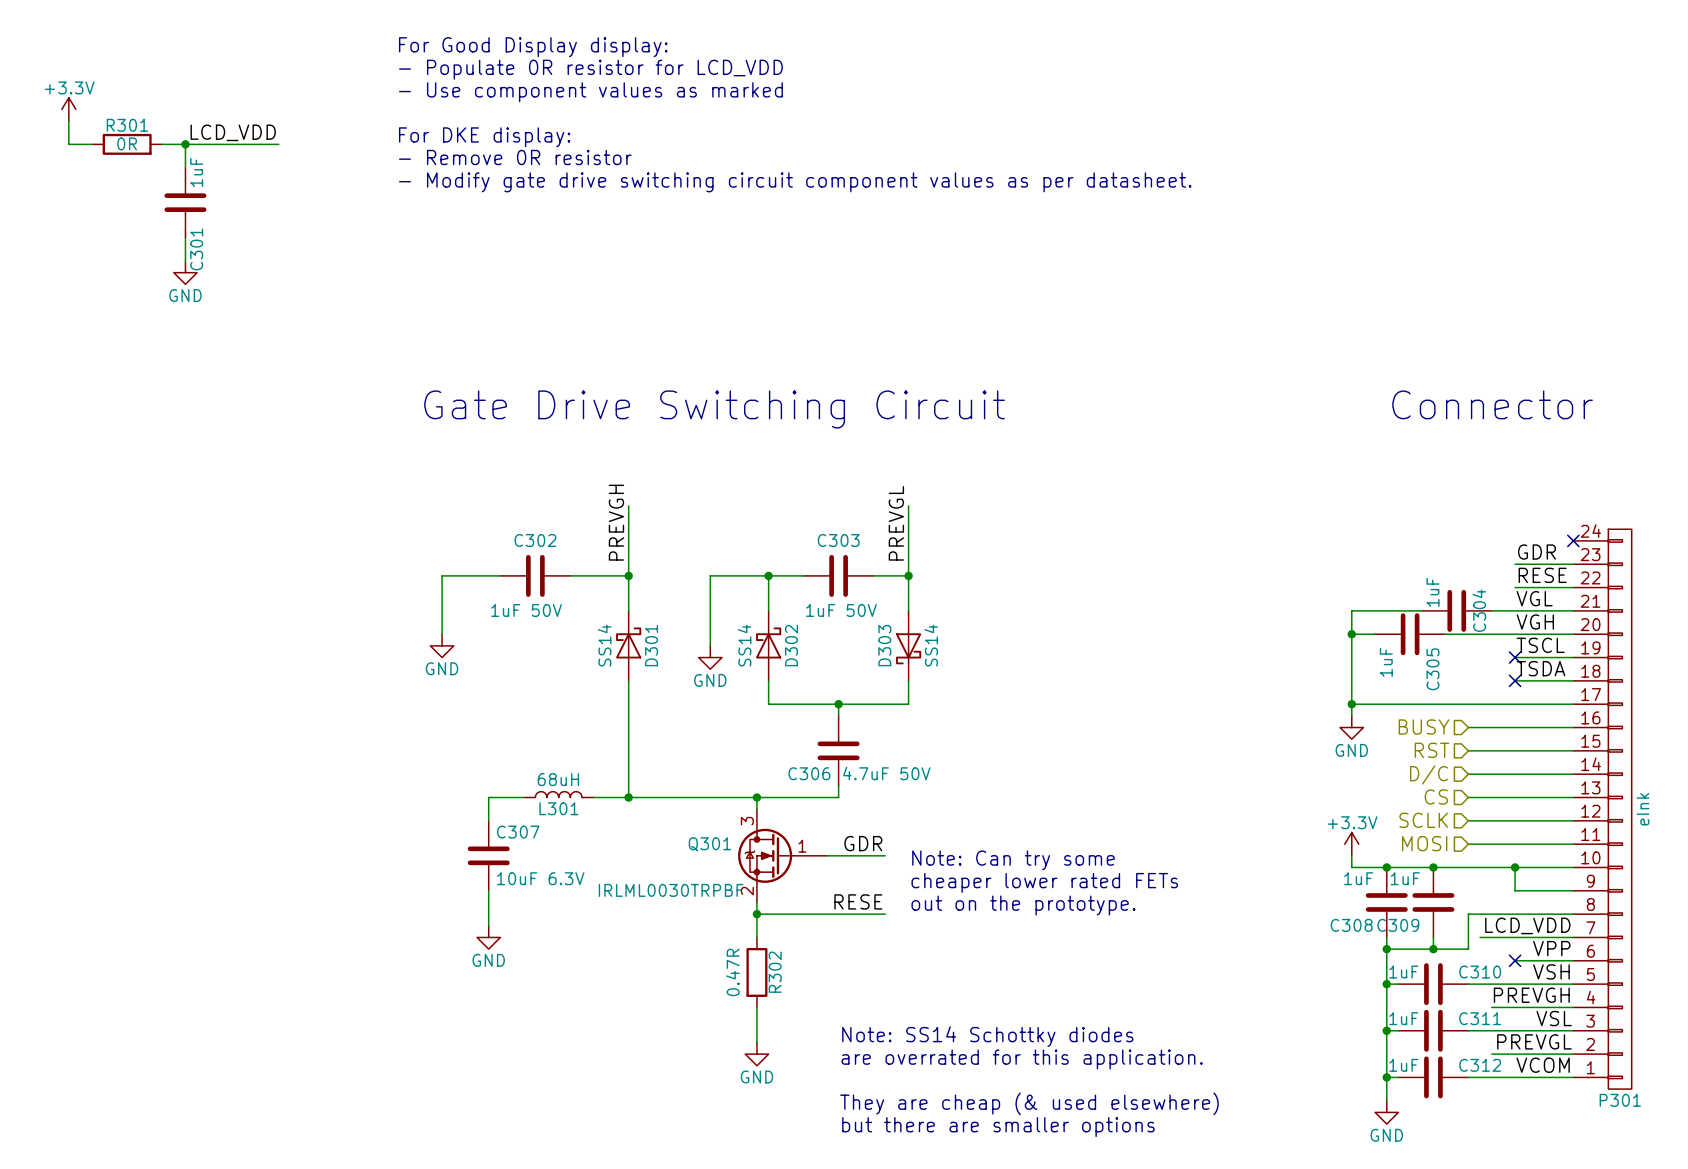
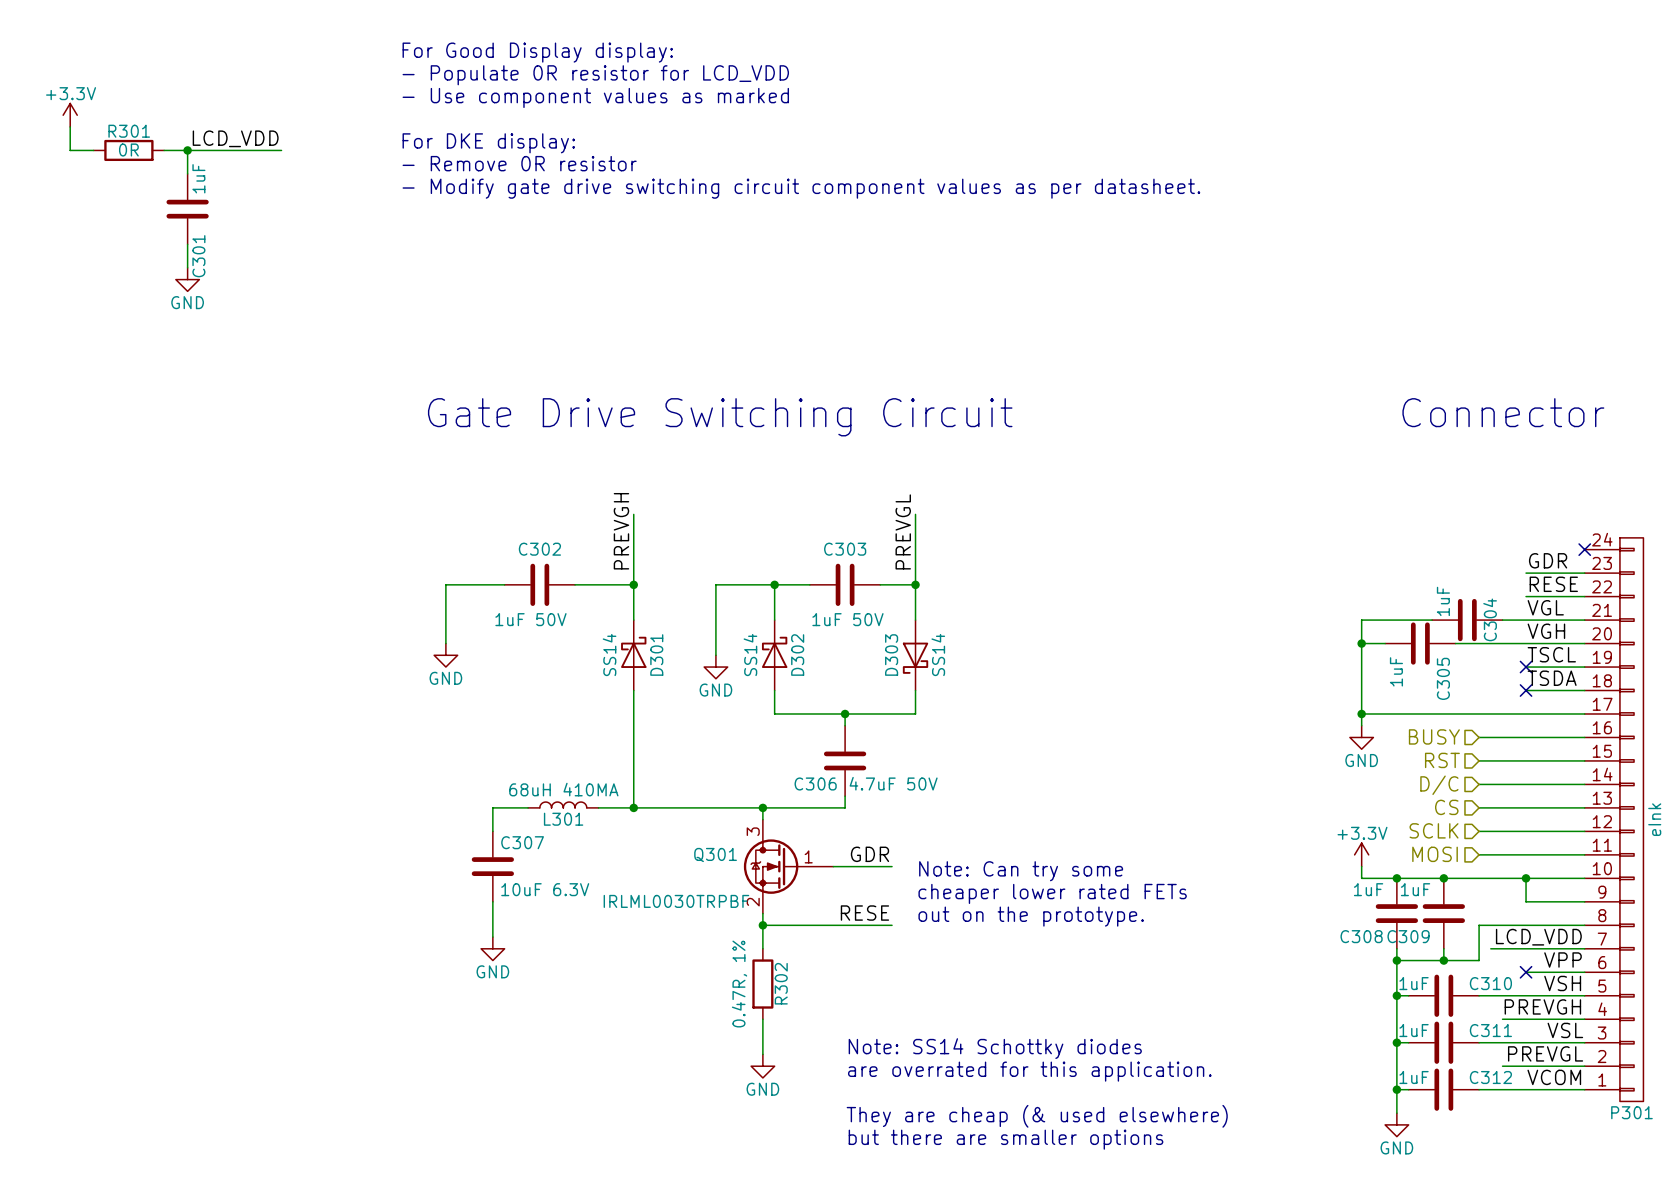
L301 value: 68uH (558, 779) -> 68uH 410MA (563, 789)
R302 value: 0.47R (732, 972) -> 0.47R, 1% (739, 984)

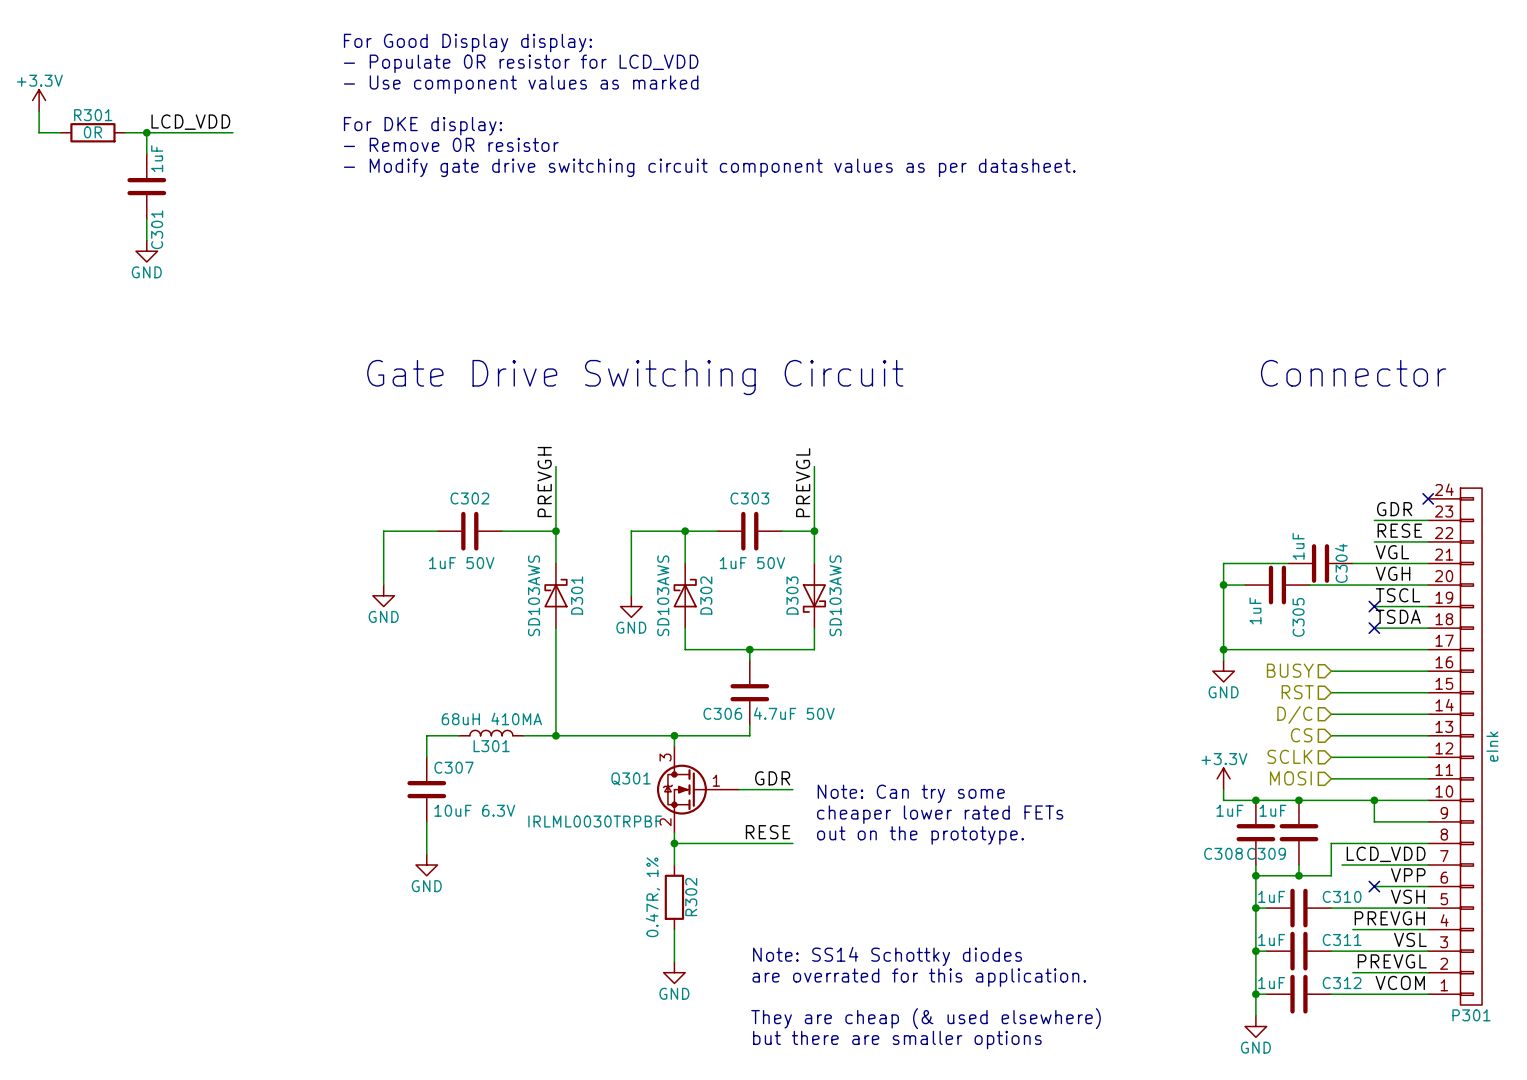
D301 value: SS14 (609, 655) -> SD103AWS (534, 595)
D302 value: SS14 (750, 655) -> SD103AWS (663, 595)
D303 value: SS14 (938, 655) -> SD103AWS (835, 595)

